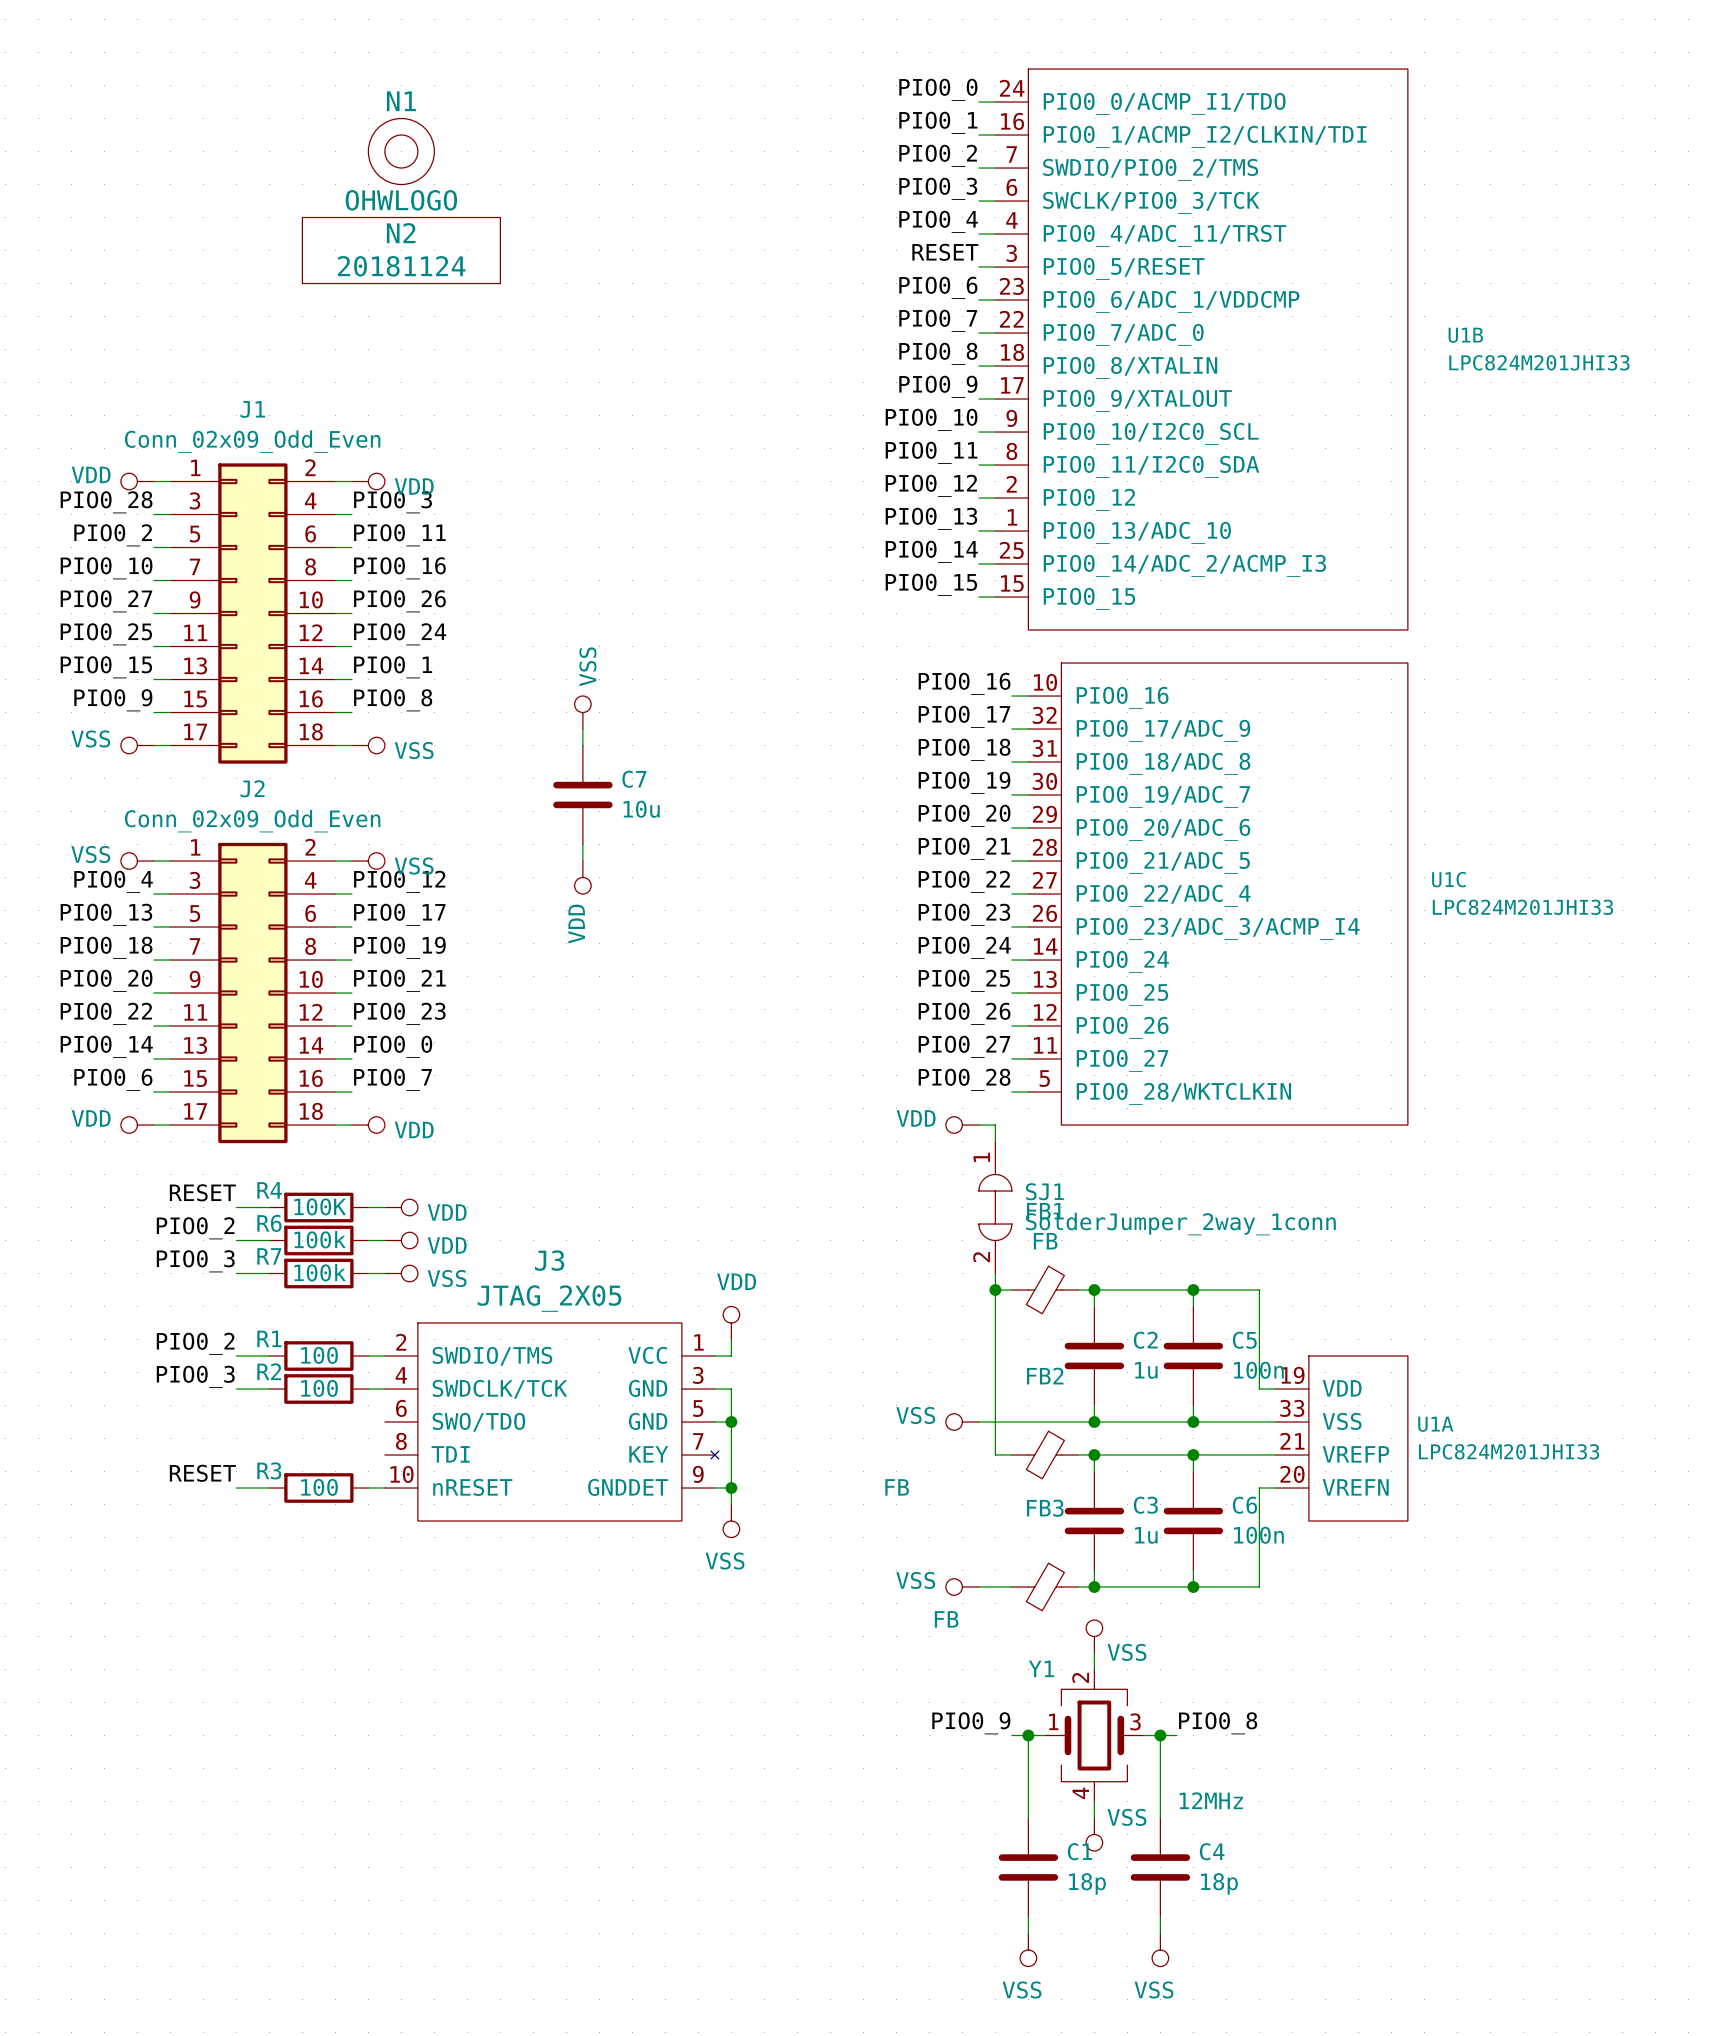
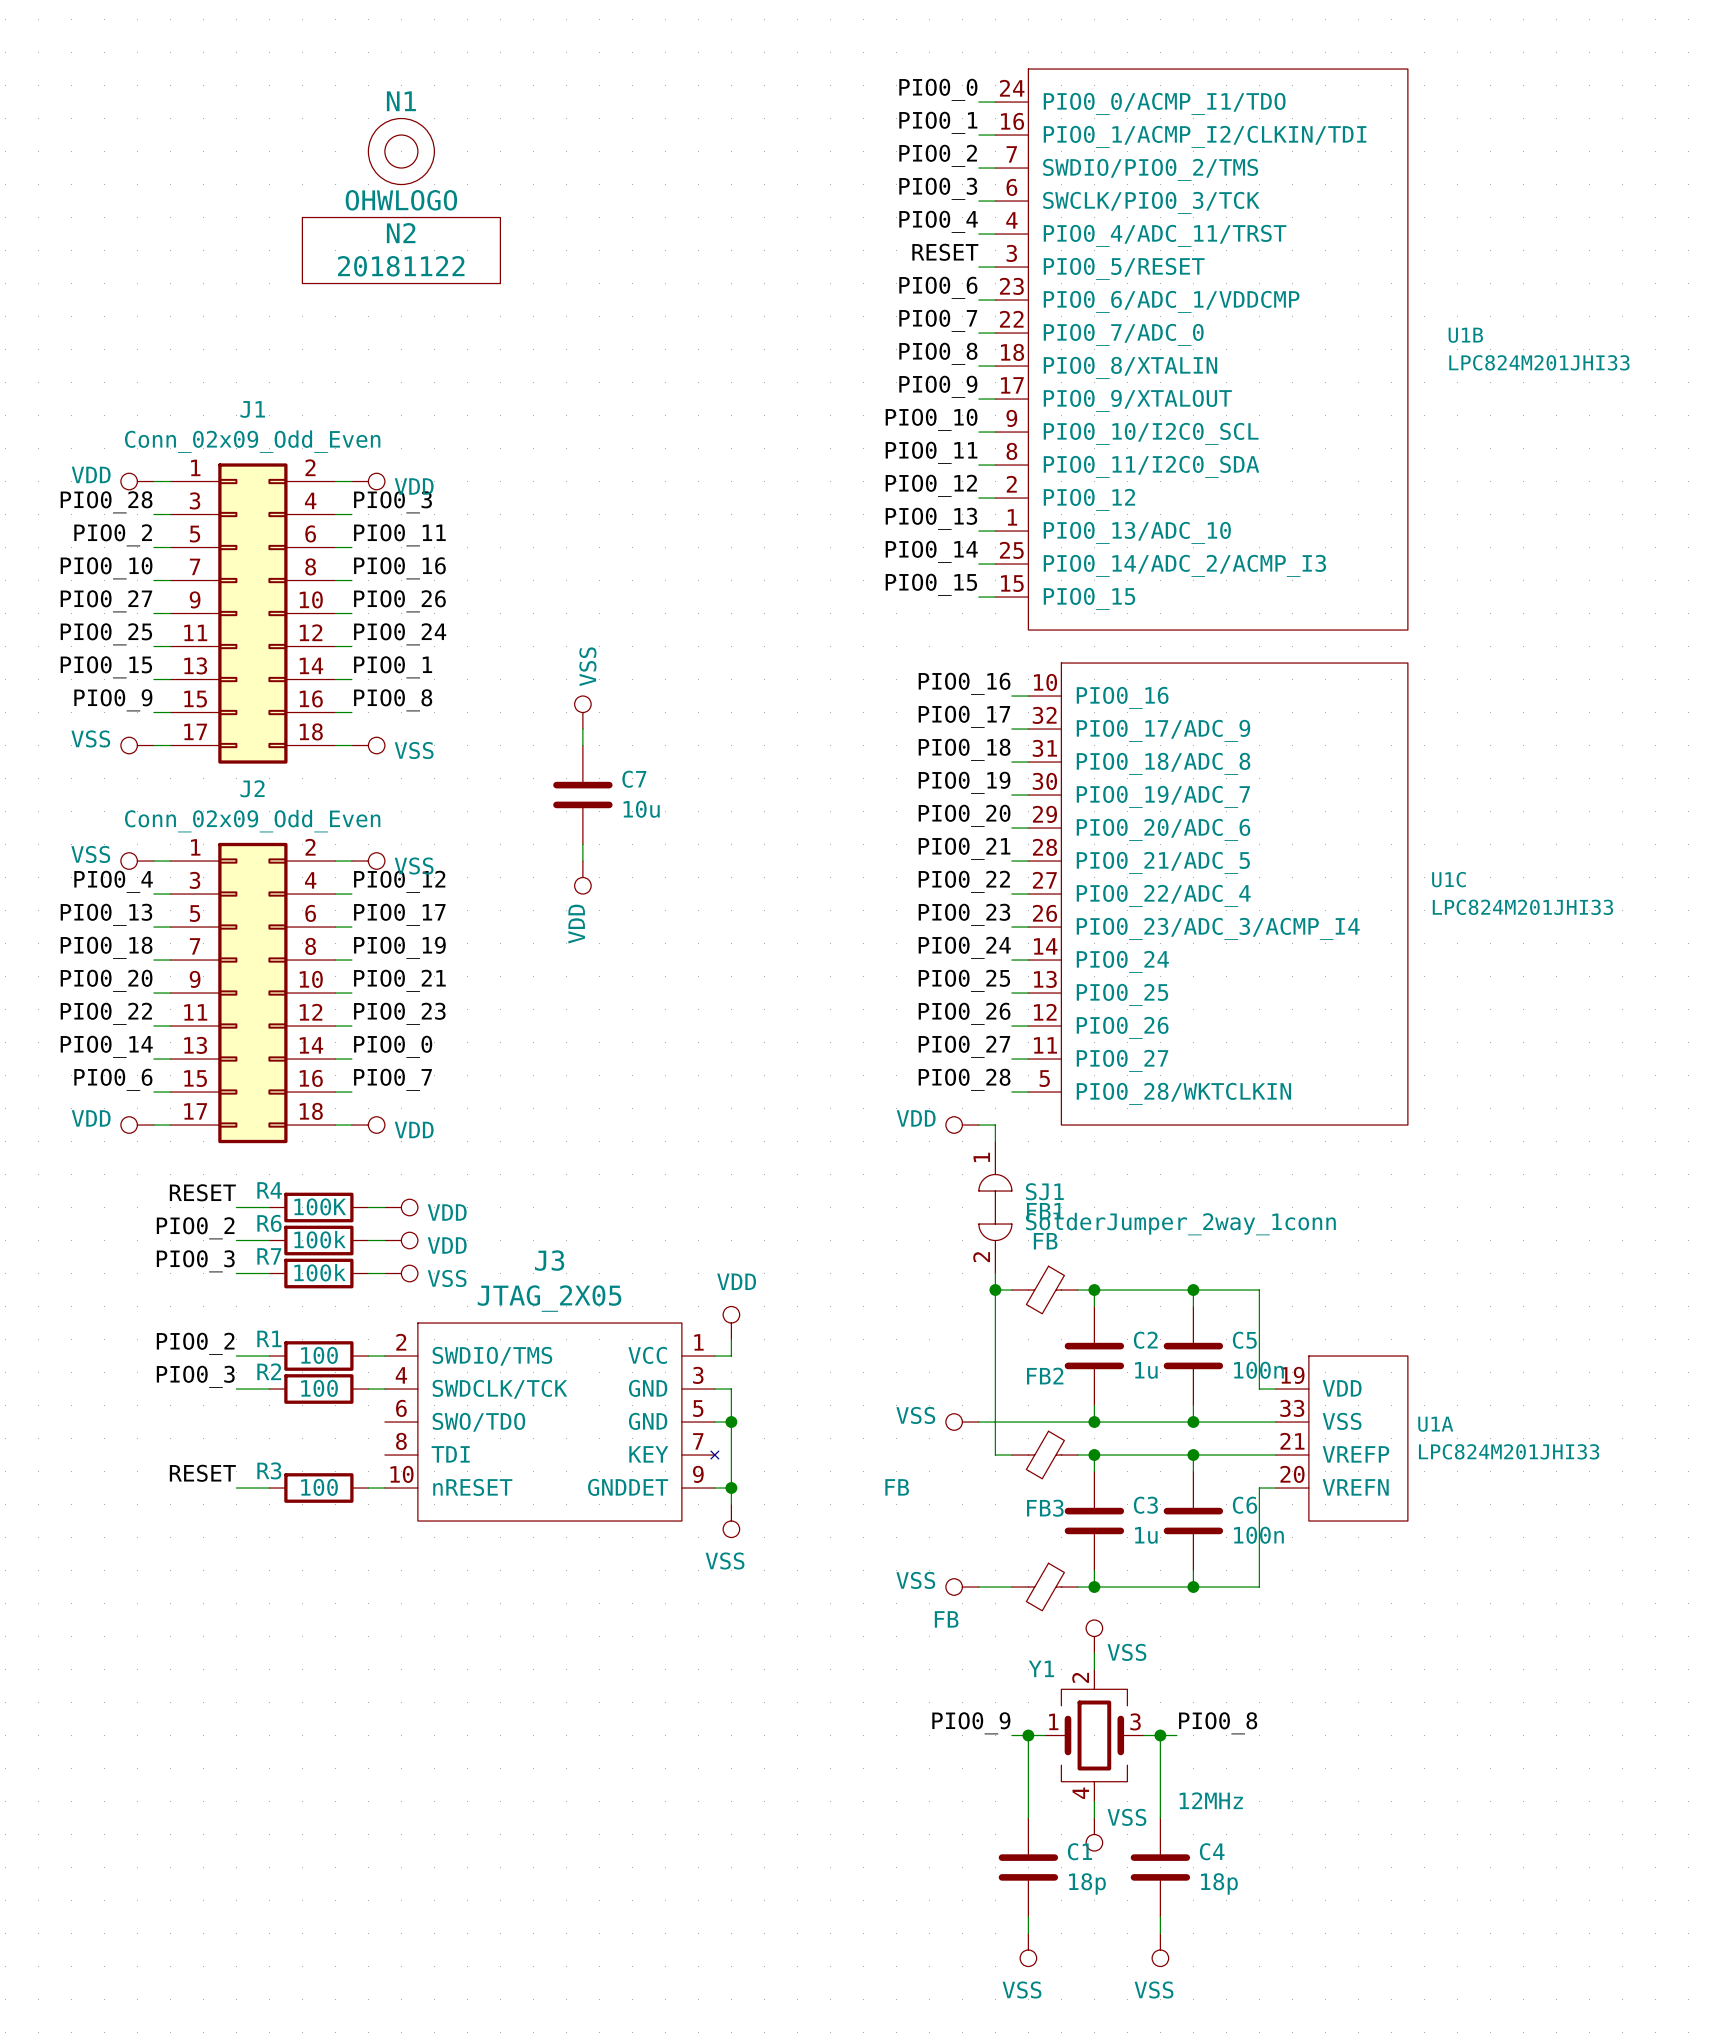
N2 value: 20181124 (401, 266) -> 20181122 (401, 266)

